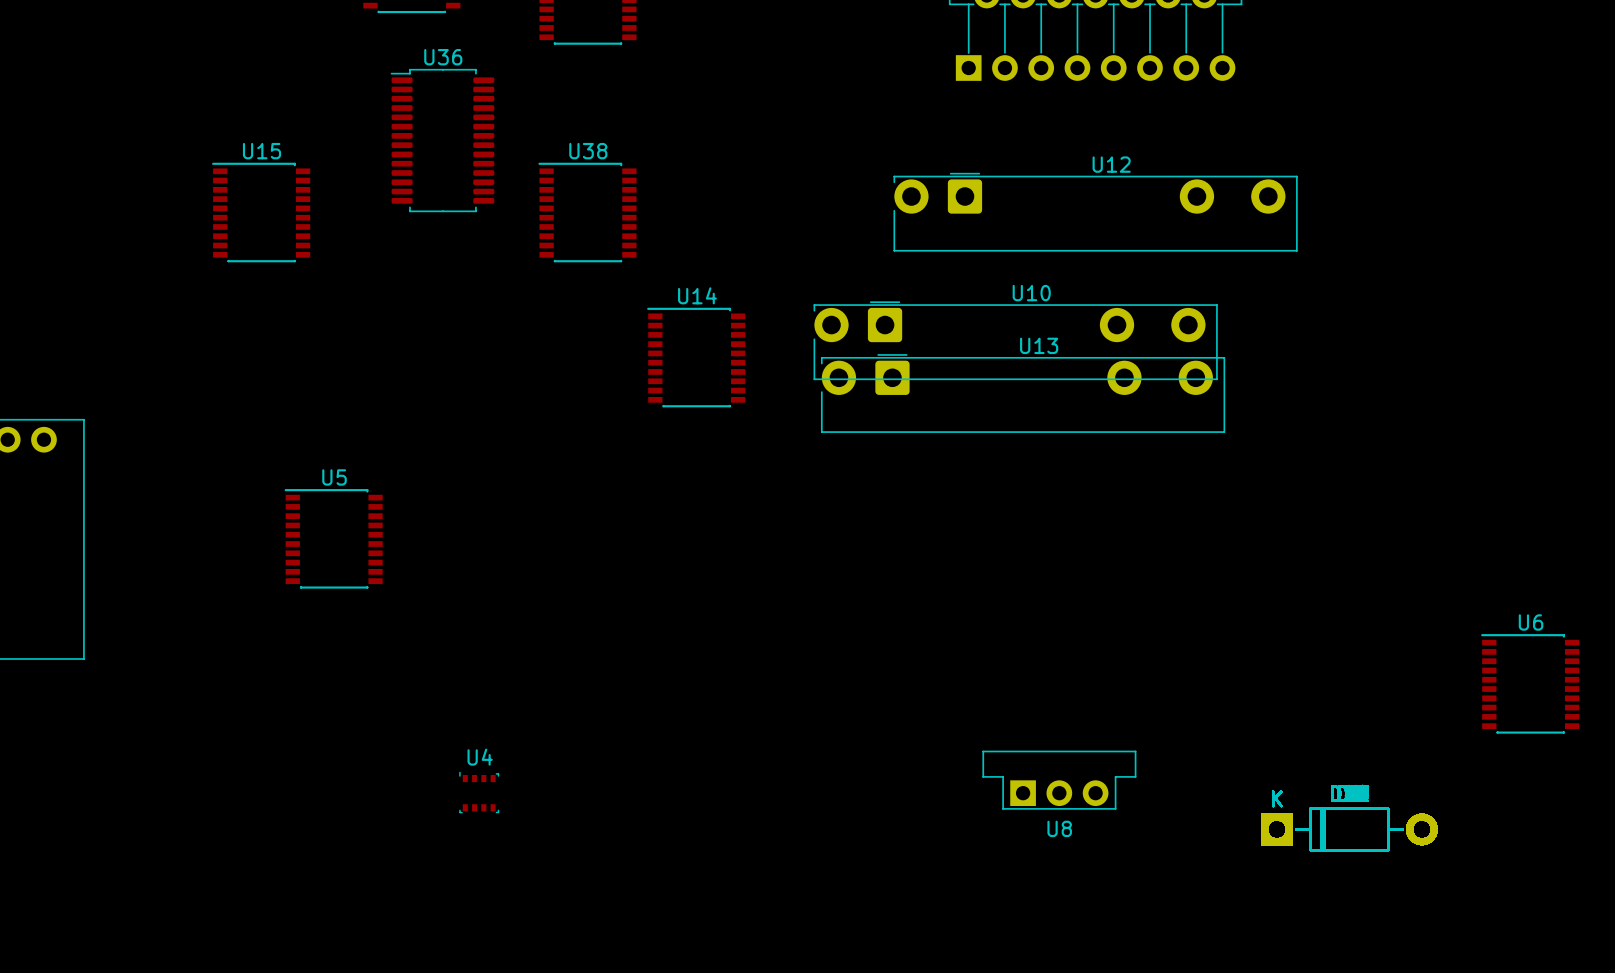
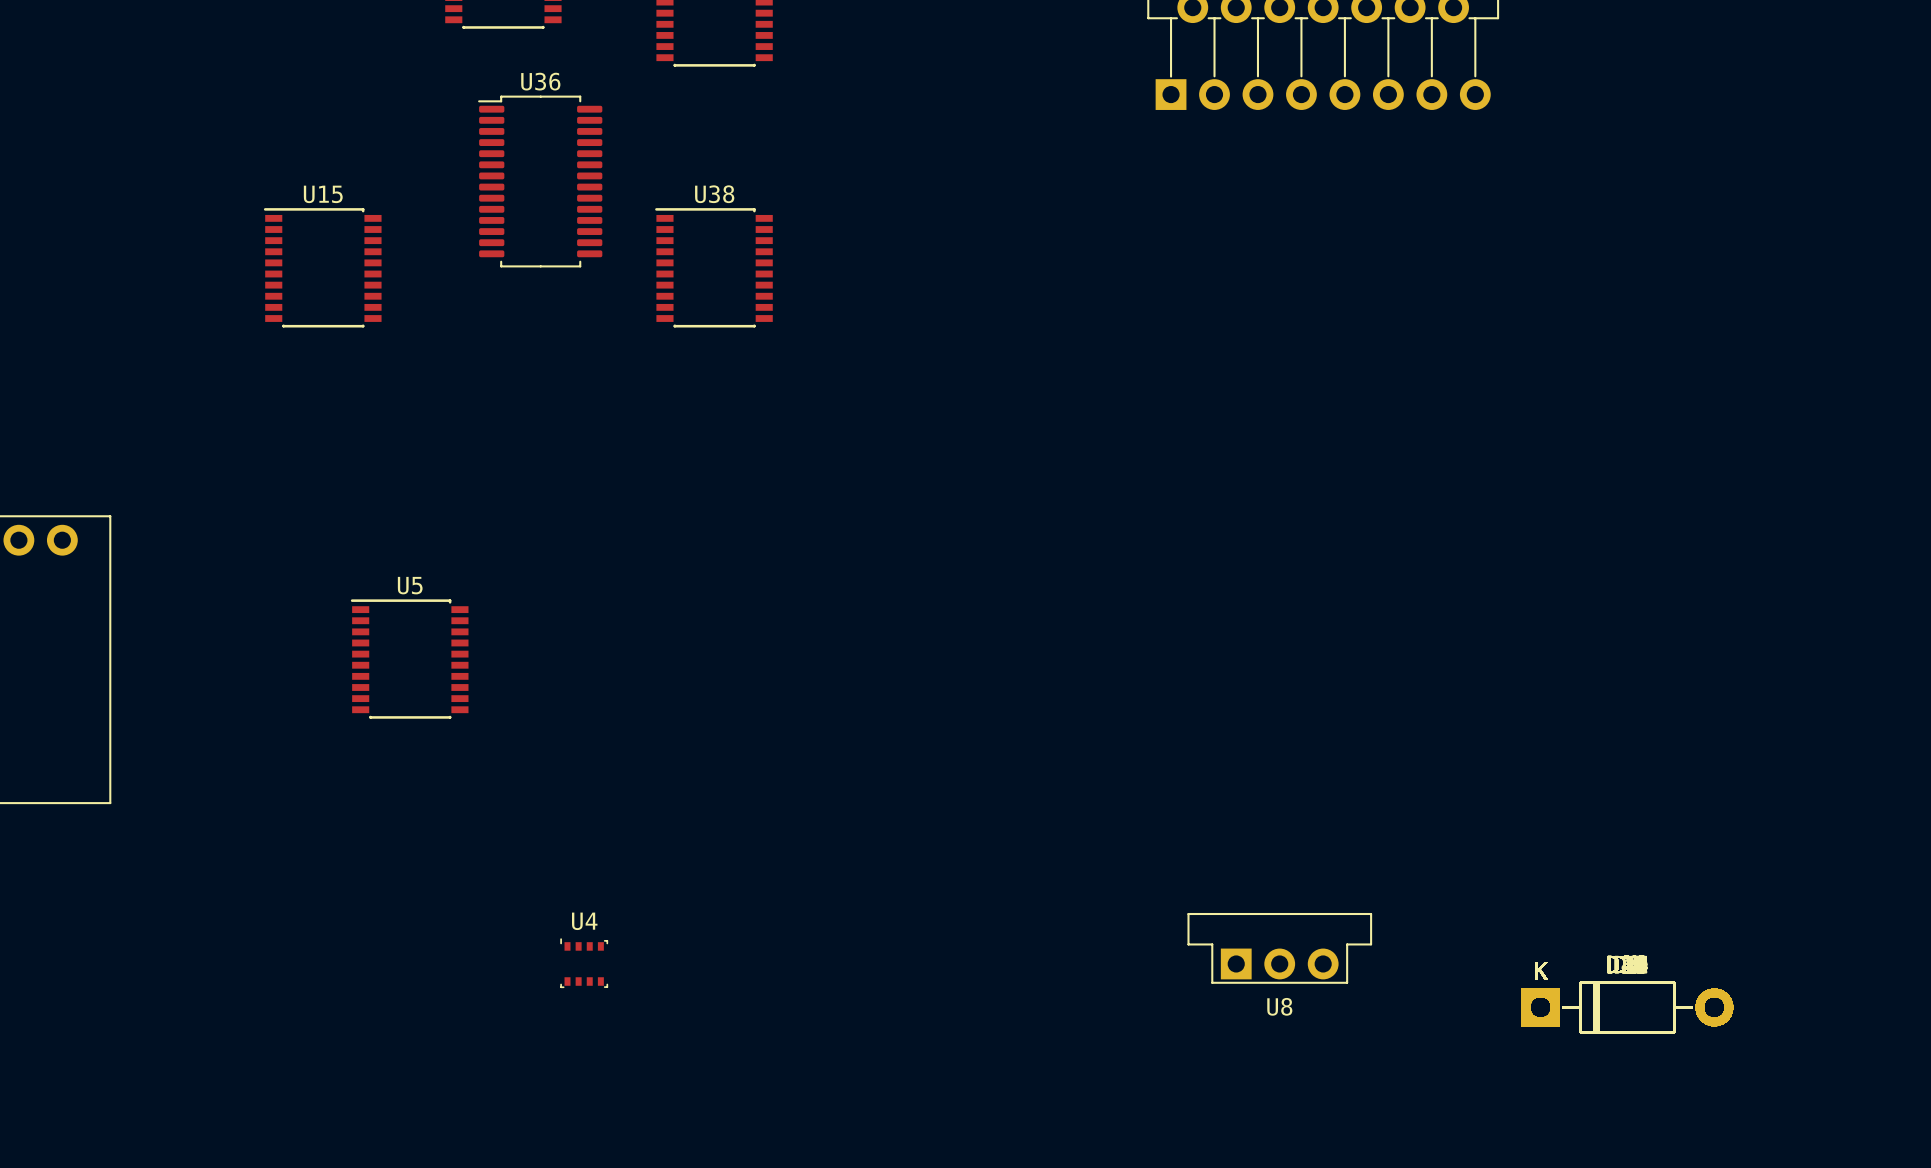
U12: (1095, 212) -> none
U10: (1015, 340) -> none
U14: (696, 357) -> none
U13: (1023, 393) -> none
U6: (1530, 683) -> none

